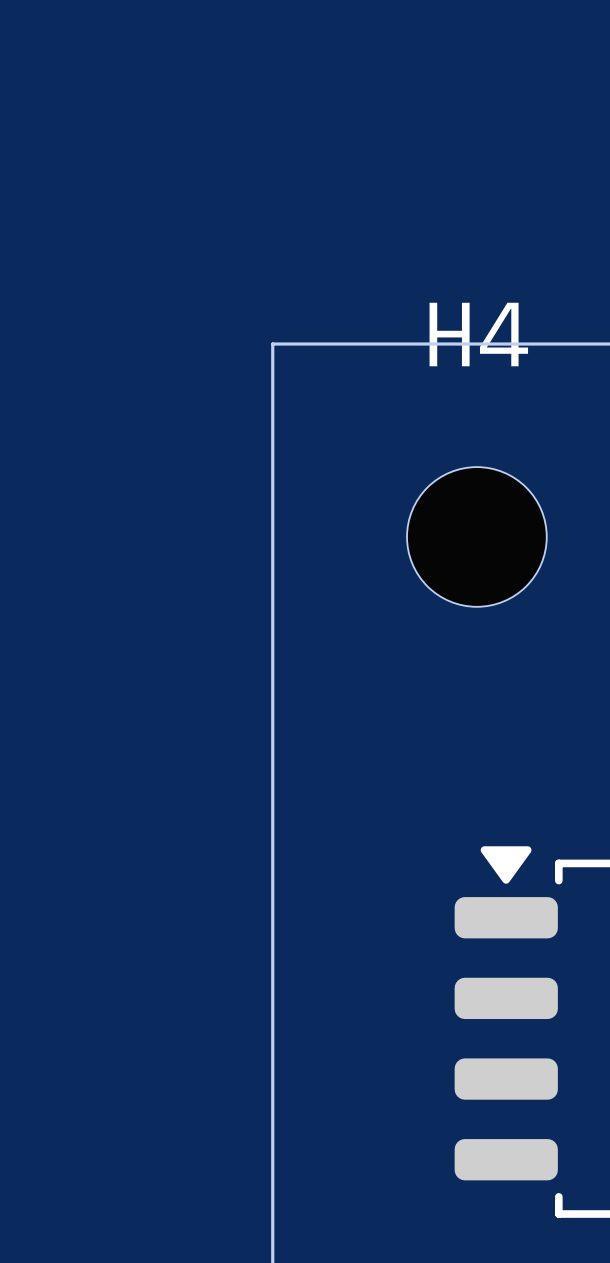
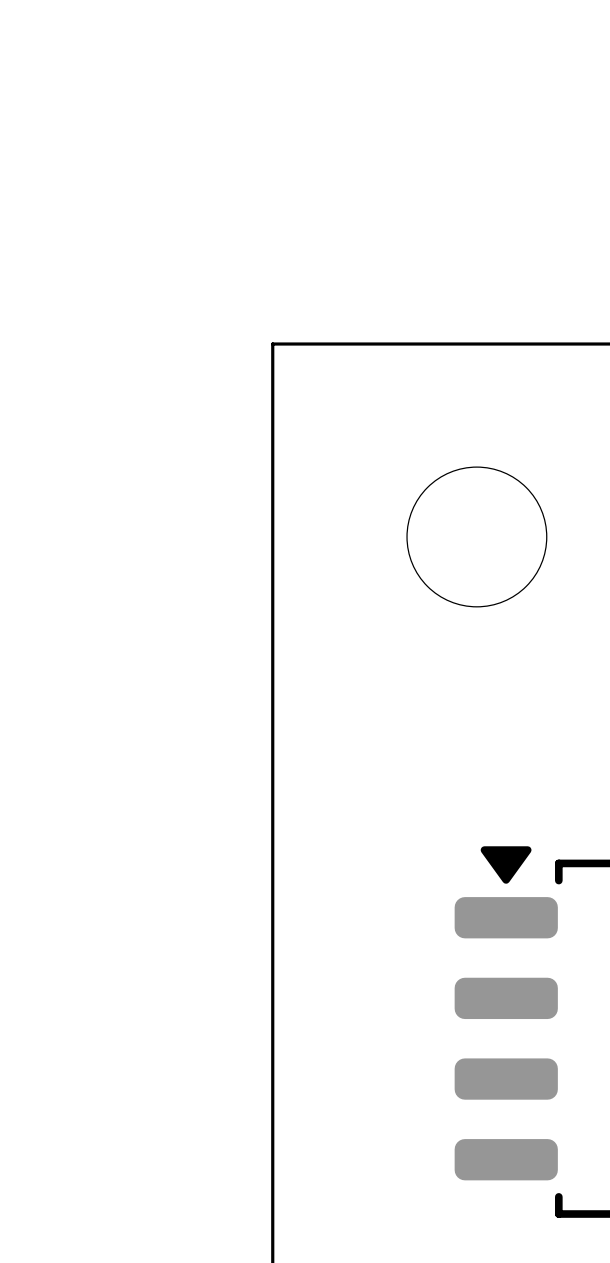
H4 name: H4 (478, 334) -> none

